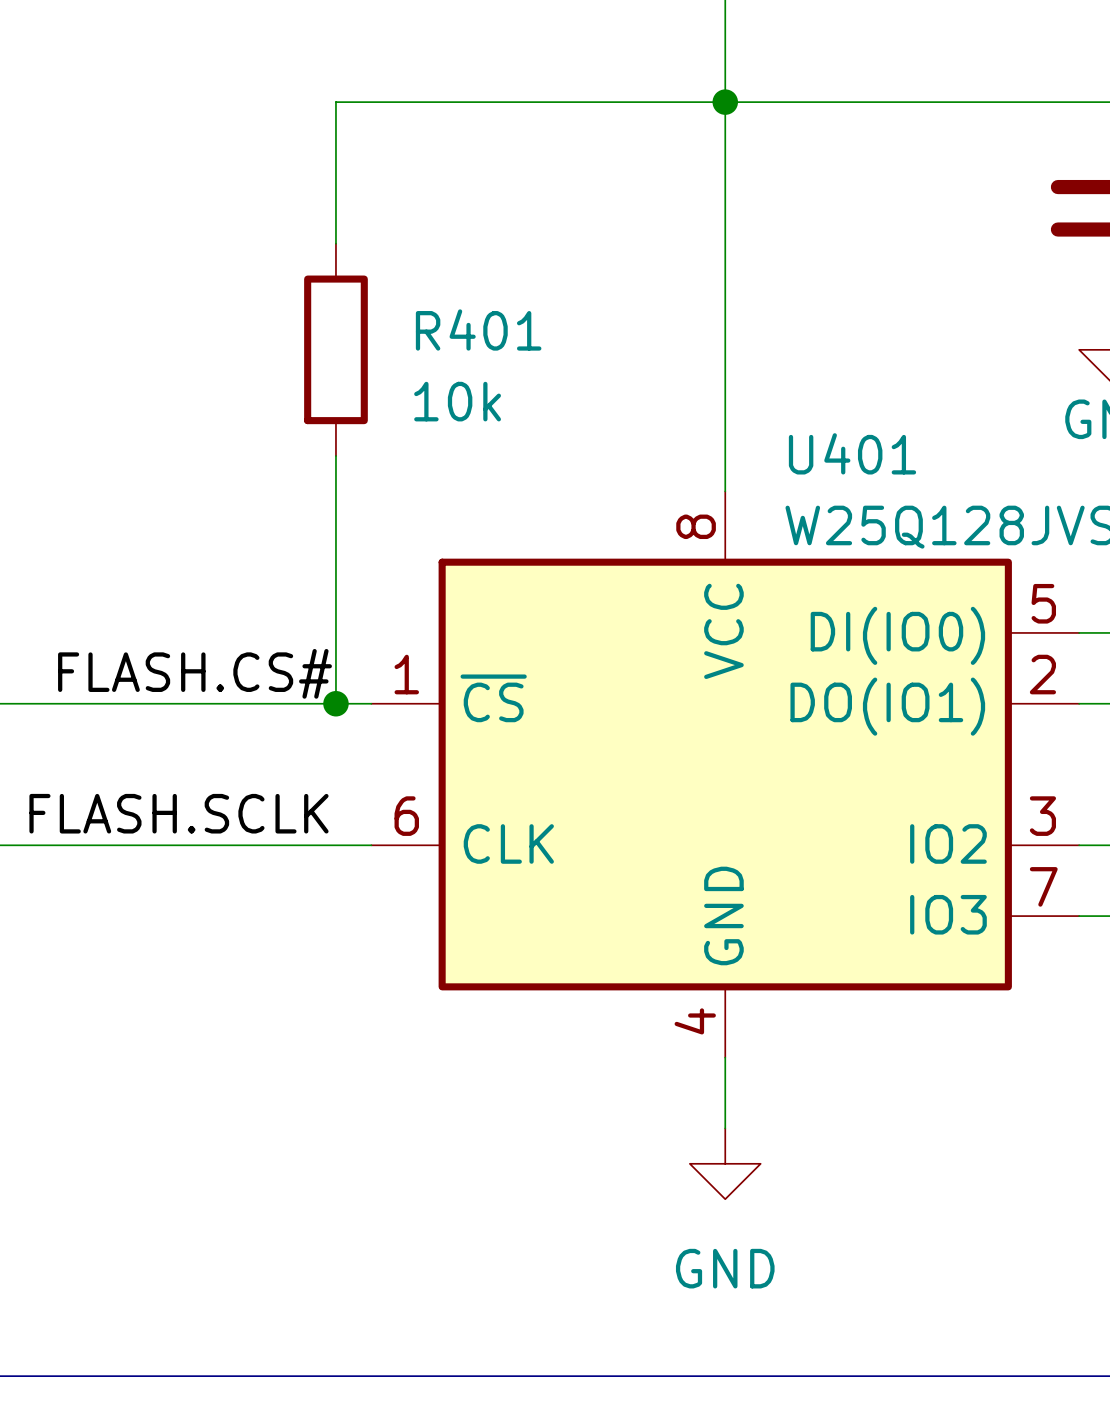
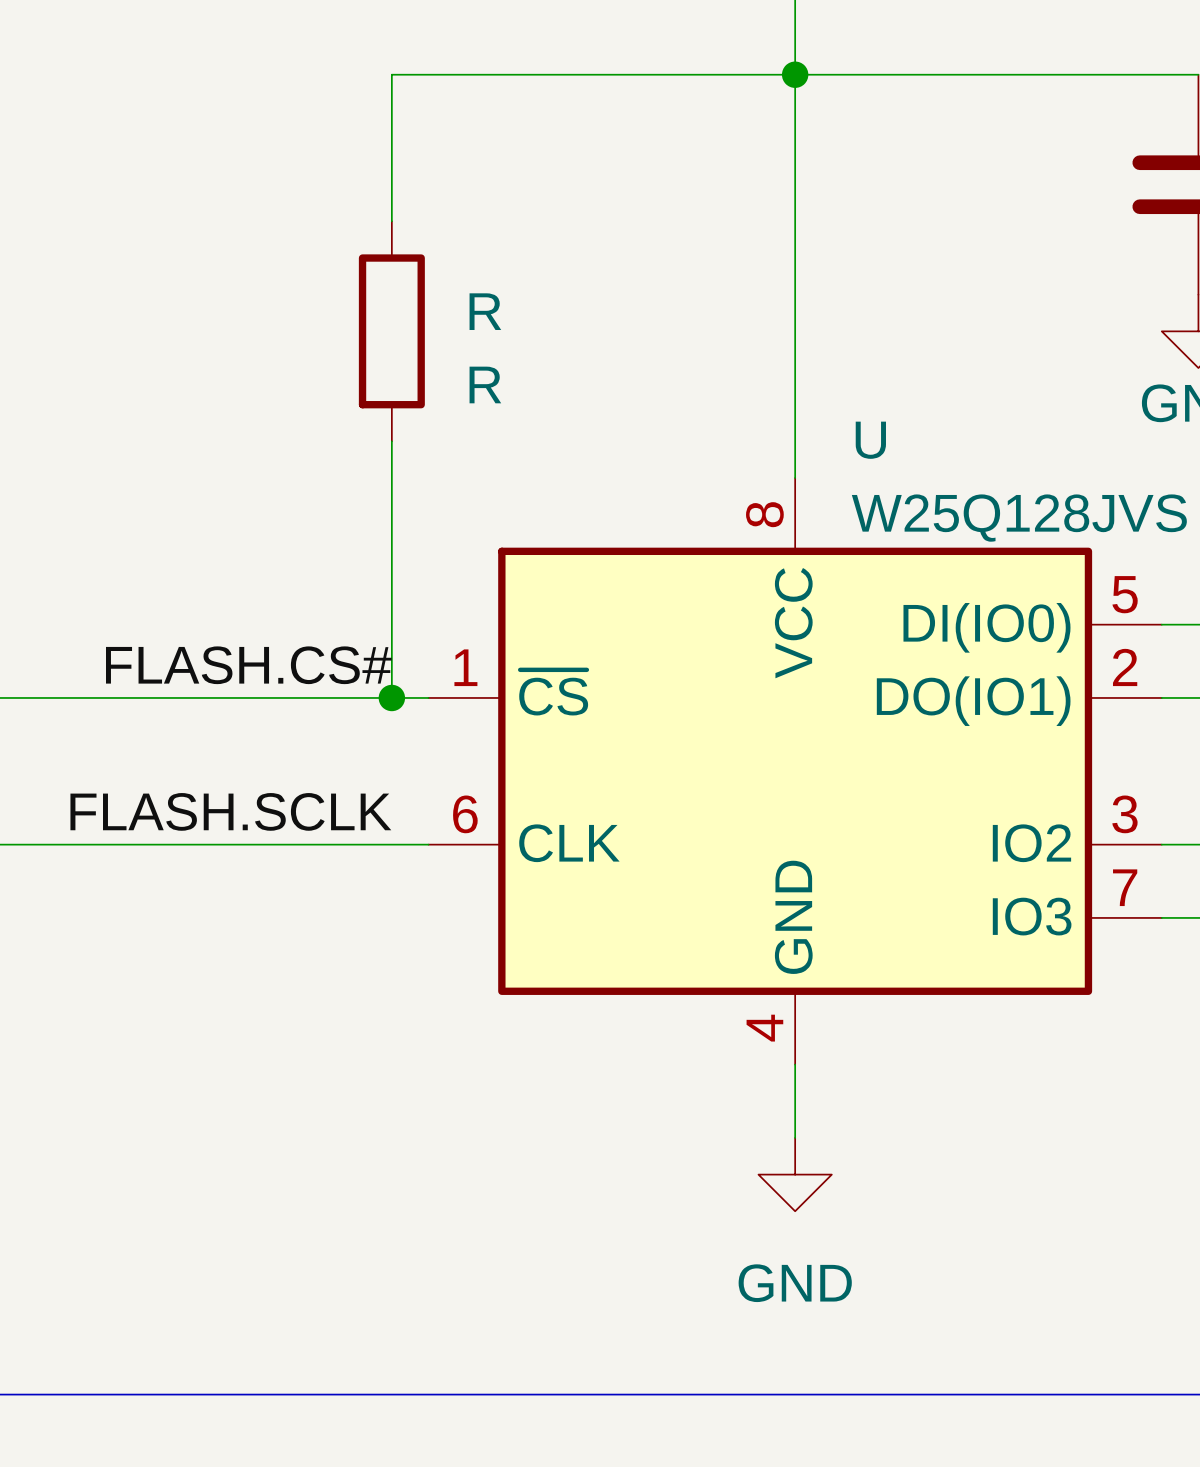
R401 name: R401 (478, 329) -> R (485, 311)
R401 value: 10k (457, 401) -> R (485, 384)
U401 name: U401 (852, 453) -> U (870, 440)

